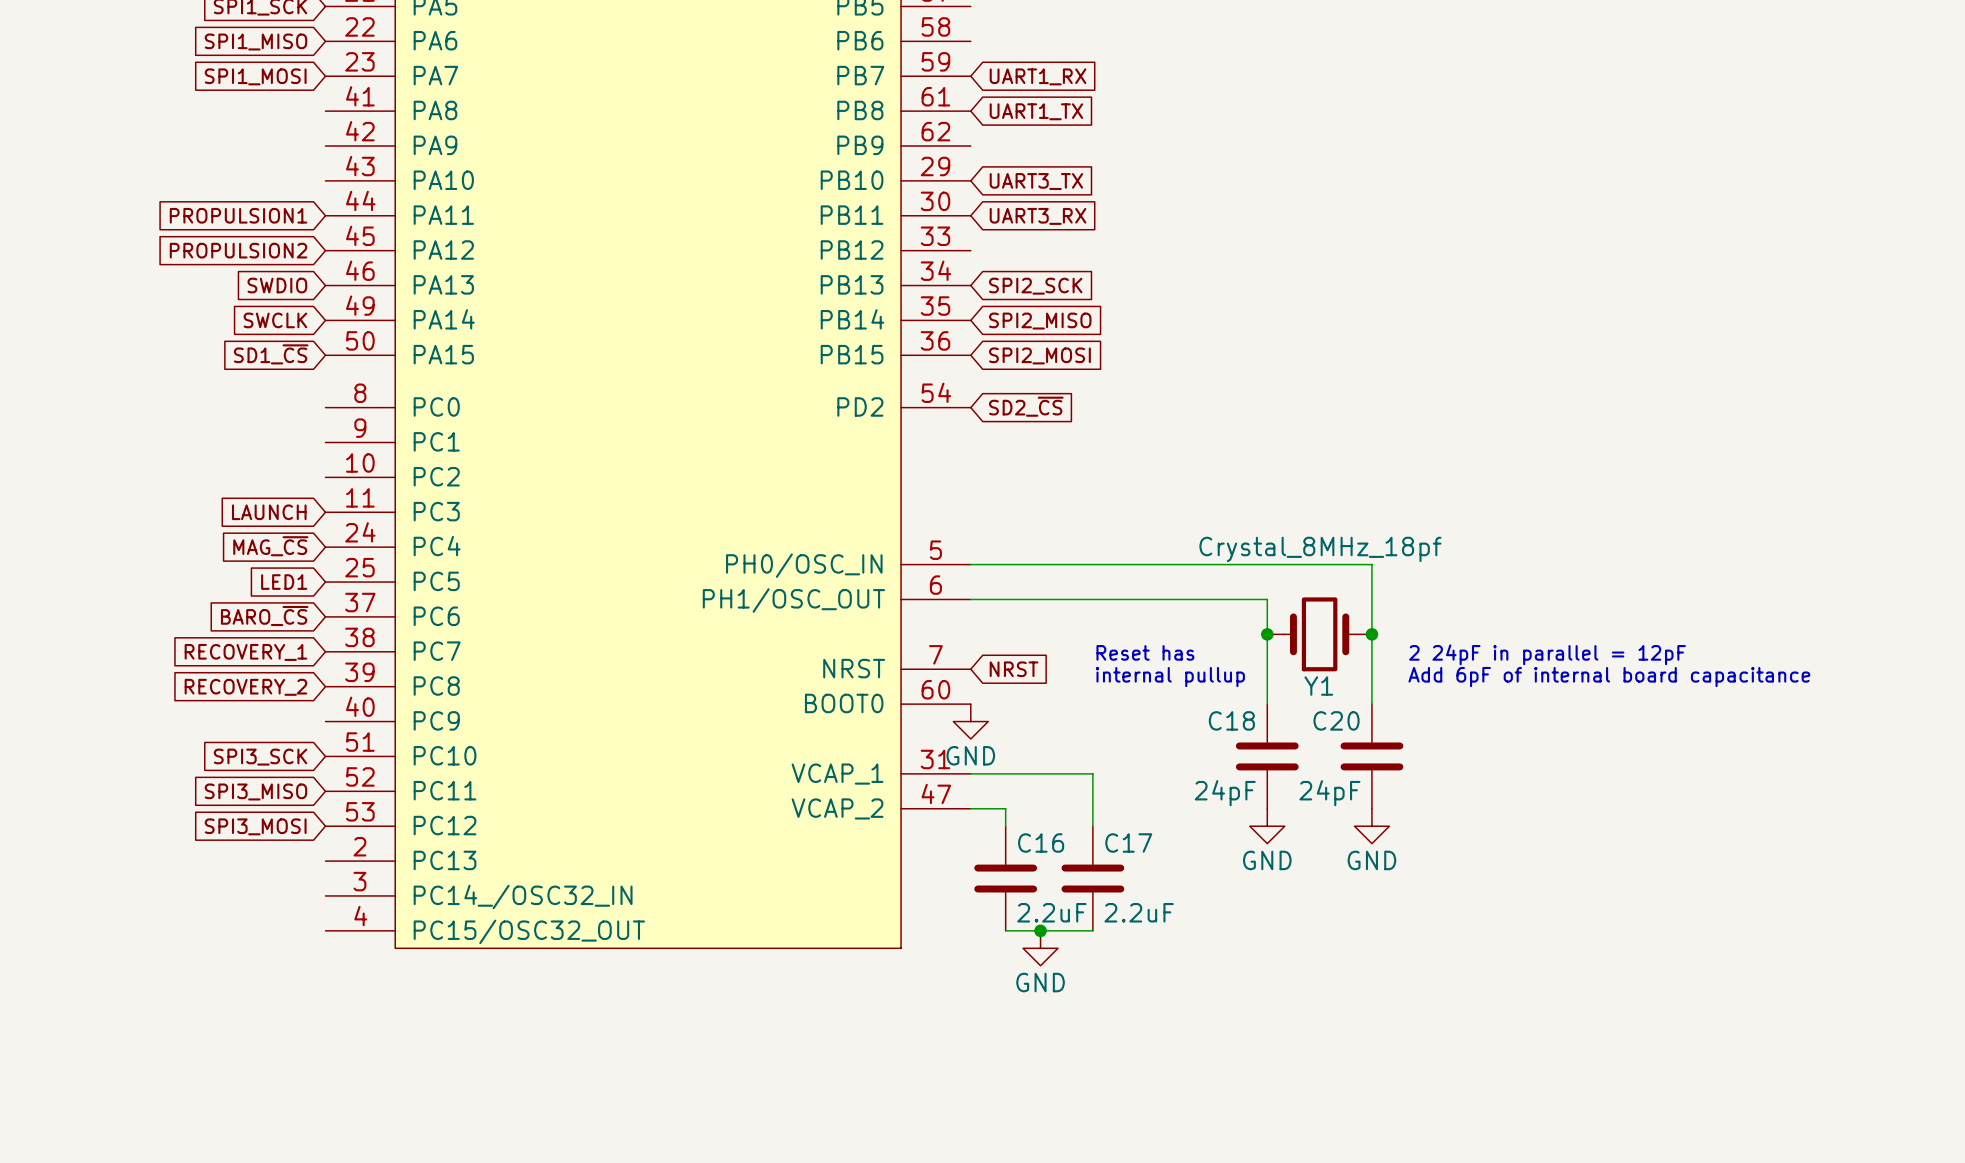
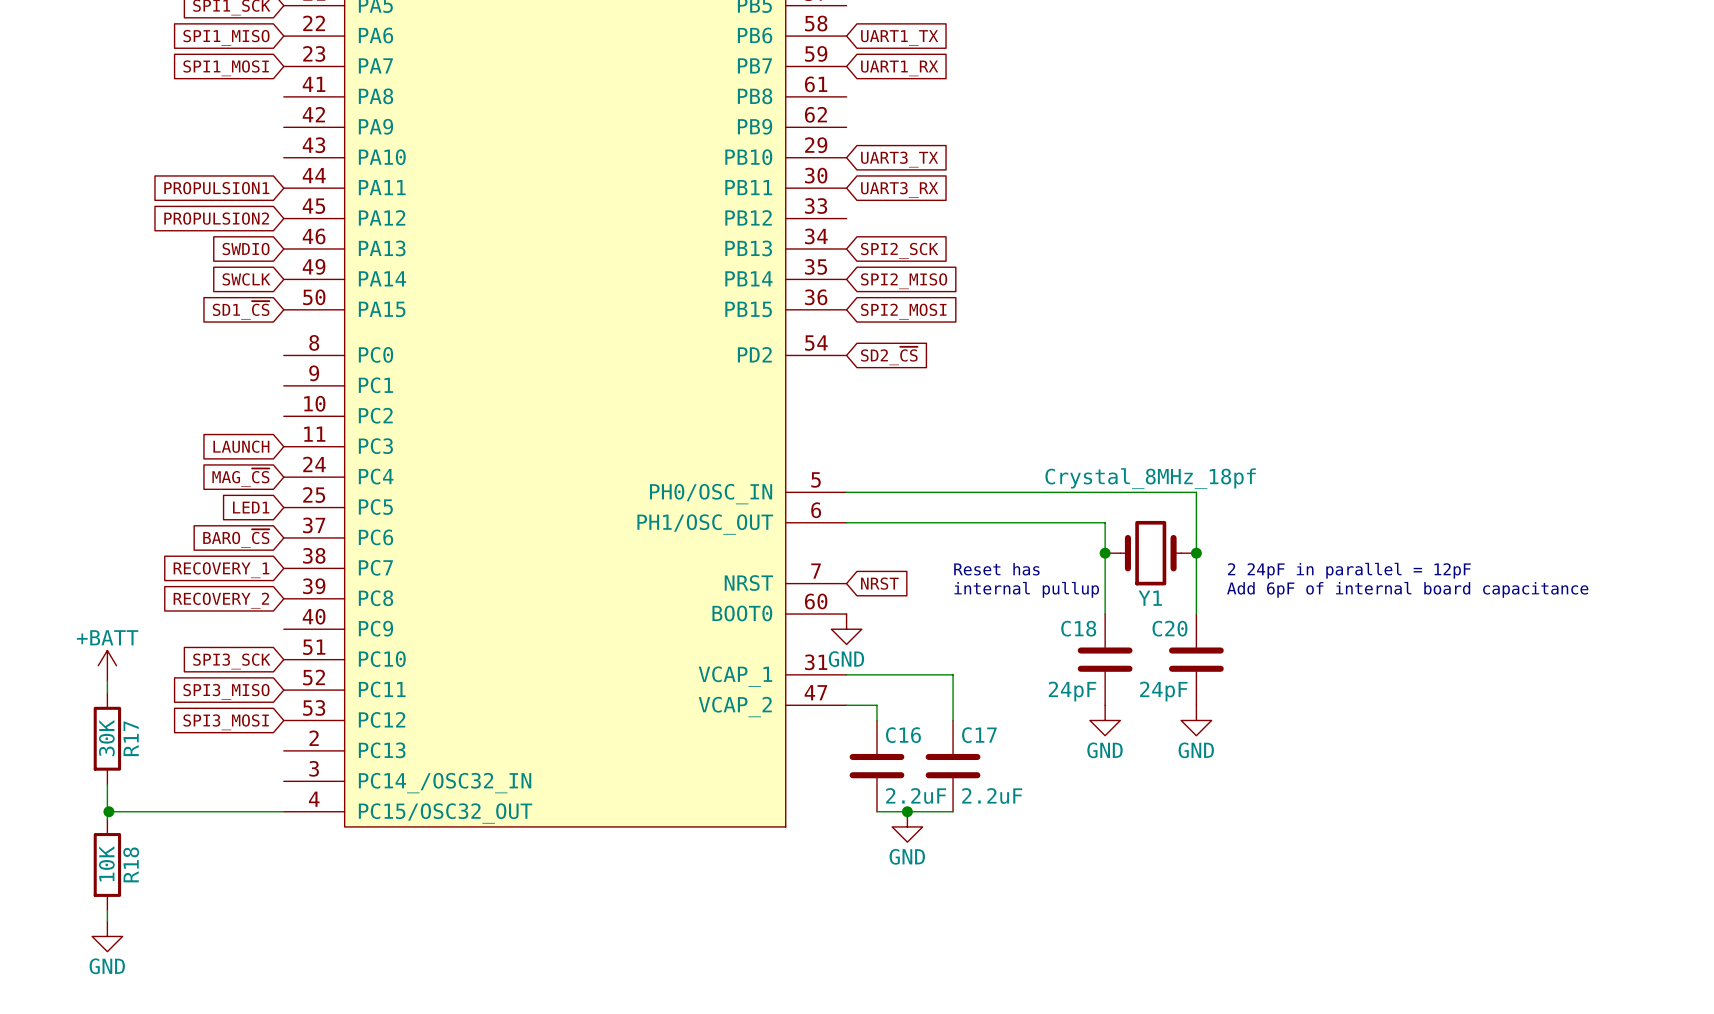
global label position: UART1_TX (1036, 111) -> UART1_TX (899, 37)
power symbol: none -> +BATT (107, 665)
wire: none -> (107, 680) (107, 693)
R17: none -> 30K (107, 738)
wire: none -> (107, 784) (108, 811)
junction: none -> (108, 811)
wire: none -> (283, 811) (107, 811) (107, 819)
R18: none -> 10K (107, 864)
wire: none -> (107, 910) (107, 921)
power symbol: none -> GND (107, 936)

